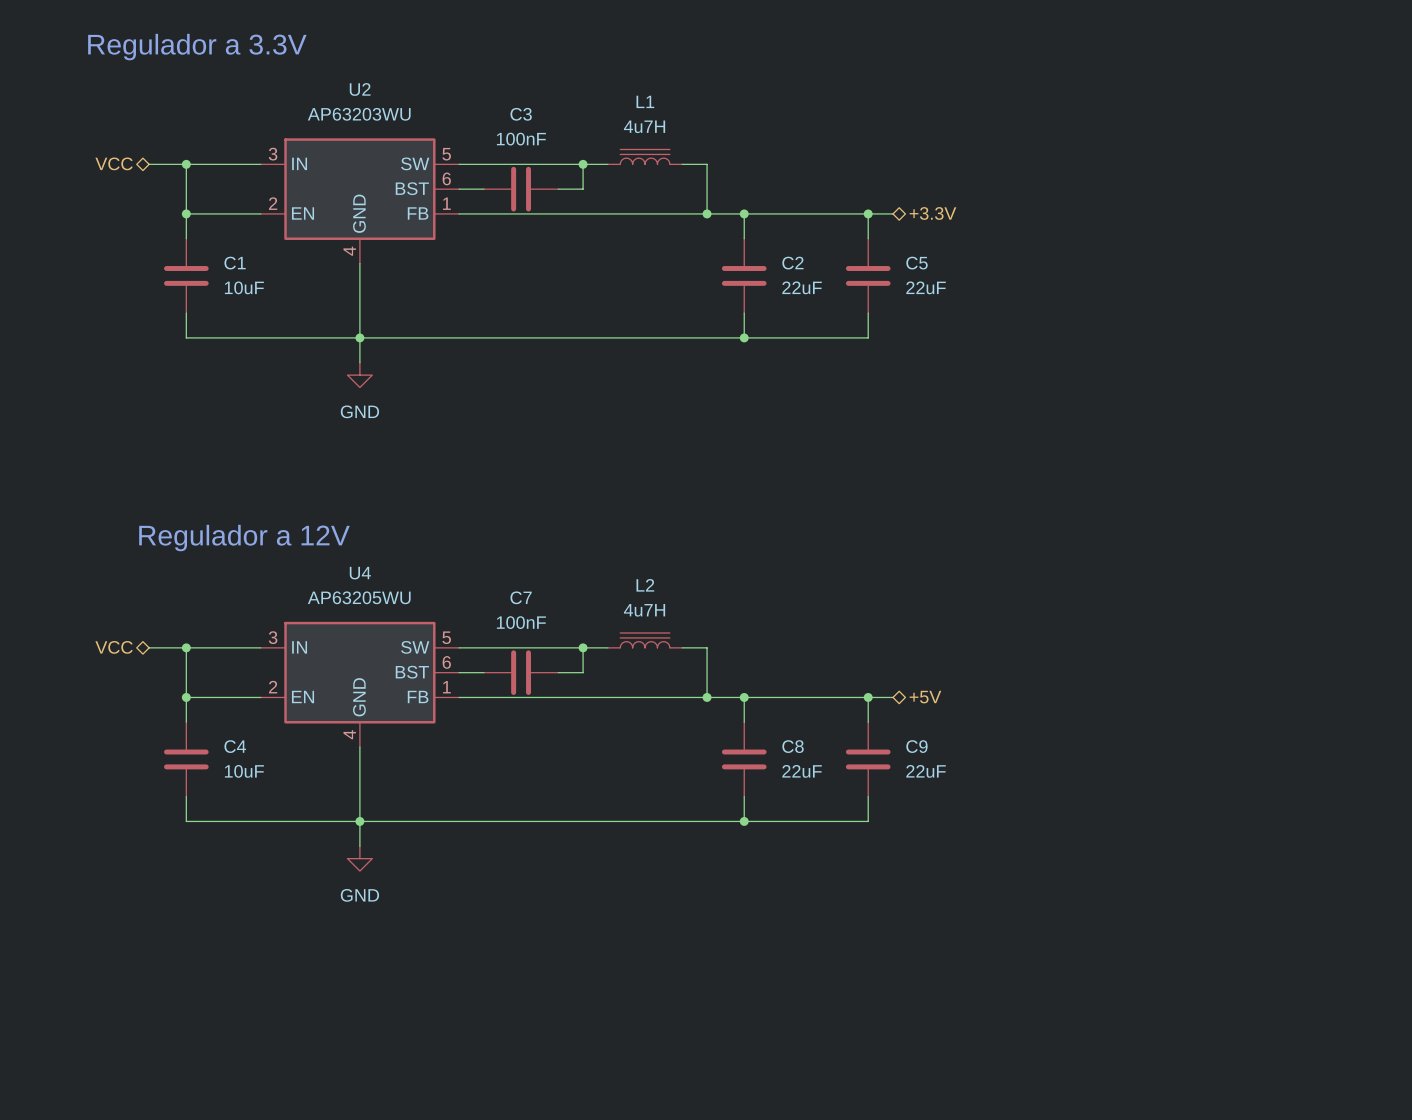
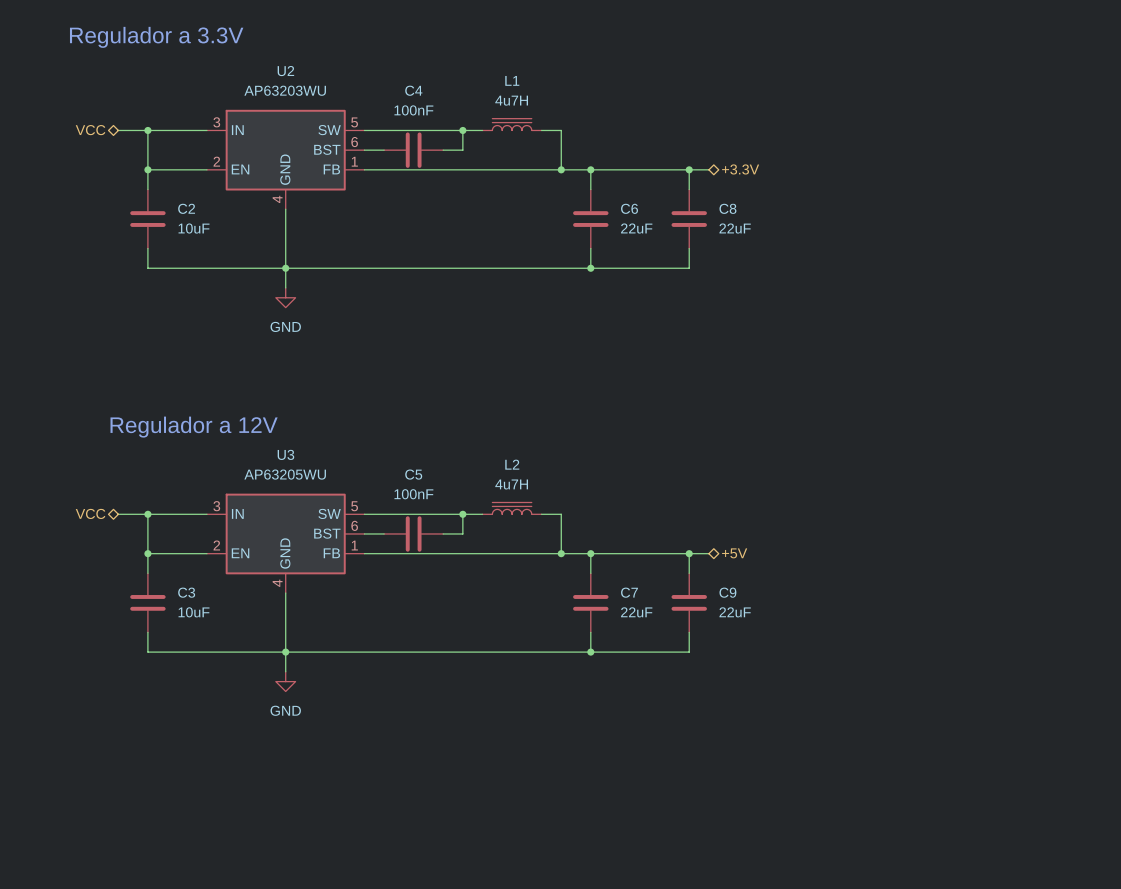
C3 name: C3 (521, 114) -> C4 (413, 90)
C1 name: C1 (235, 263) -> C2 (186, 208)
C2 name: C2 (792, 263) -> C6 (629, 208)
C5 name: C5 (917, 263) -> C8 (727, 208)
U4 name: U4 (360, 573) -> U3 (285, 454)
C7 name: C7 (521, 597) -> C5 (413, 474)
C4 name: C4 (235, 746) -> C3 (186, 592)
C8 name: C8 (793, 746) -> C7 (629, 592)

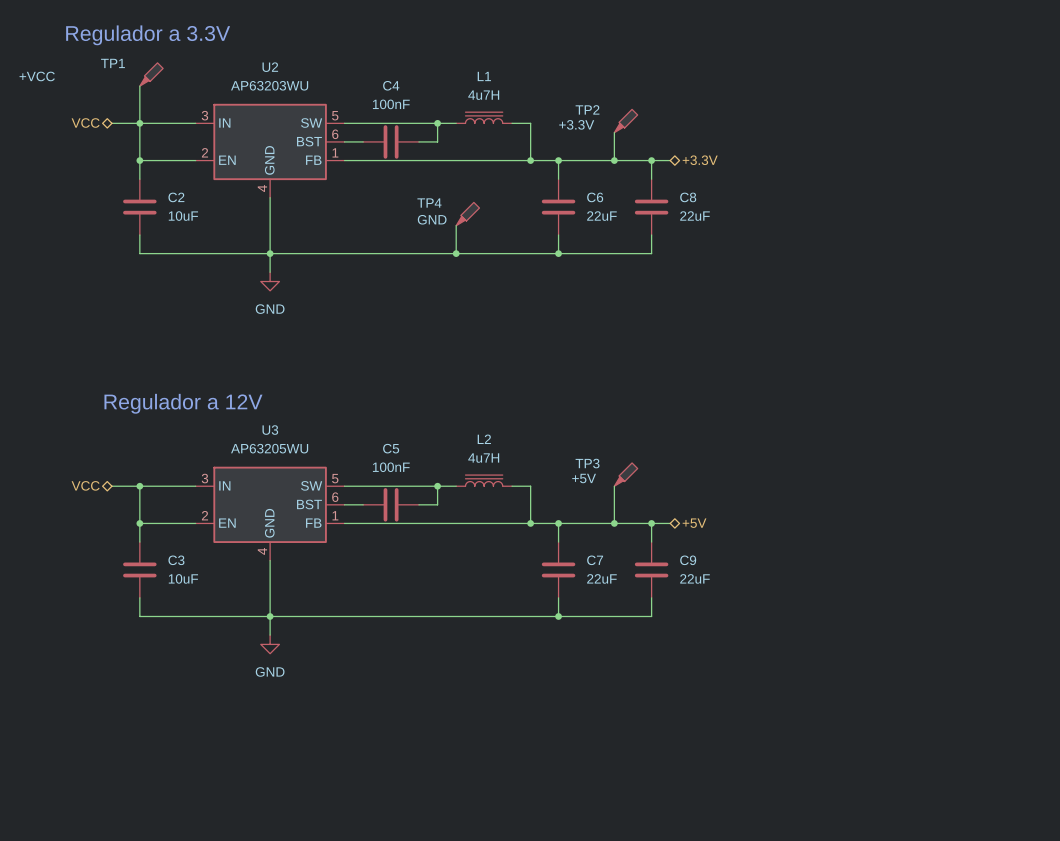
TP1: none -> +VCC (151, 74)
wire: none -> (139, 86) (139, 123)
TP2: none -> +3.3V (626, 121)
wire: none -> (614, 132) (614, 160)
junction: none -> (614, 160)
TP4: none -> GND (467, 214)
wire: none -> (456, 225) (456, 253)
junction: none -> (456, 253)
TP3: none -> +5V (626, 474)
wire: none -> (614, 486) (614, 523)
junction: none -> (614, 523)

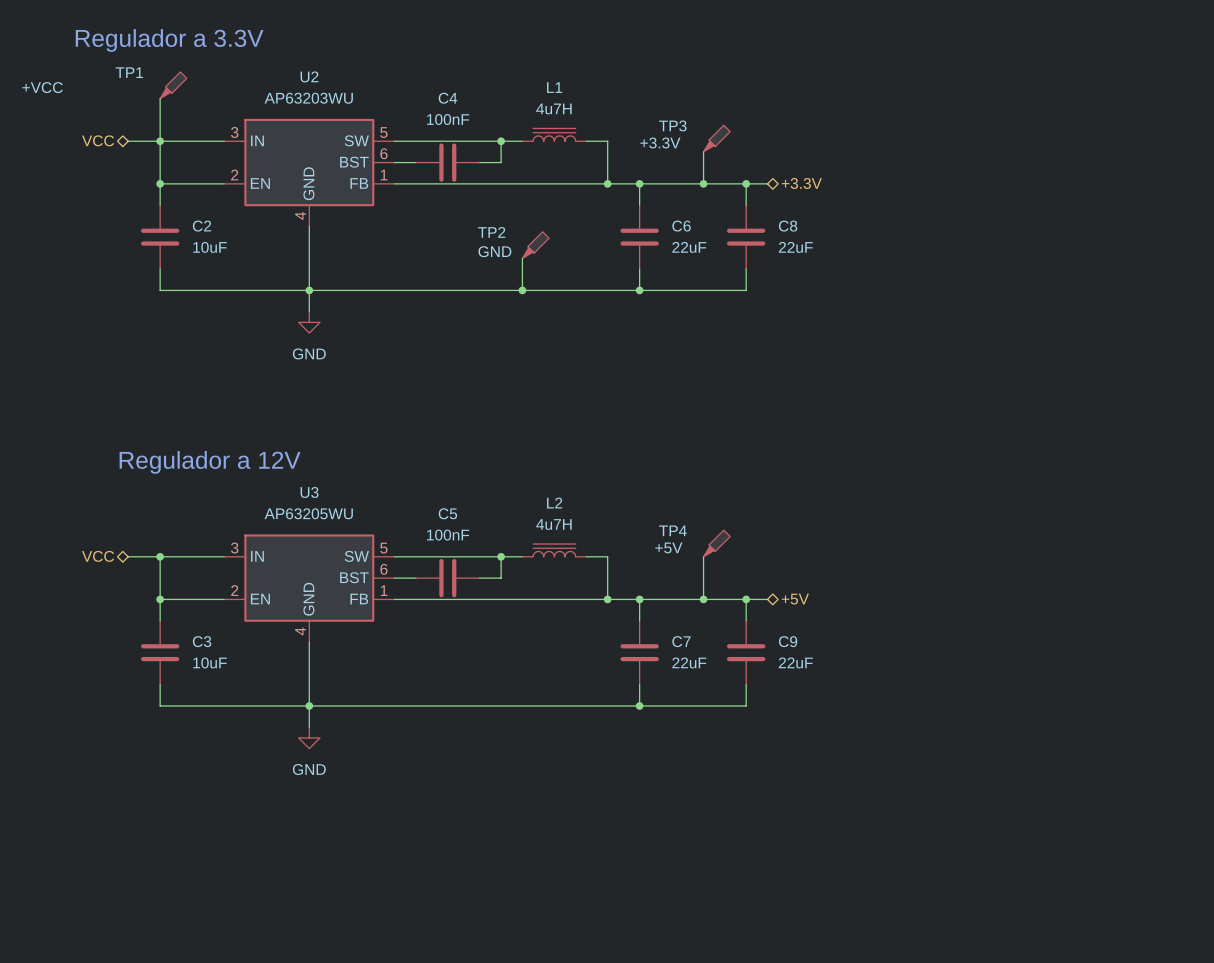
TP2 name: TP2 (587, 109) -> TP3 (672, 125)
TP4 name: TP4 (429, 203) -> TP2 (491, 232)
TP3 name: TP3 (587, 463) -> TP4 (672, 530)

